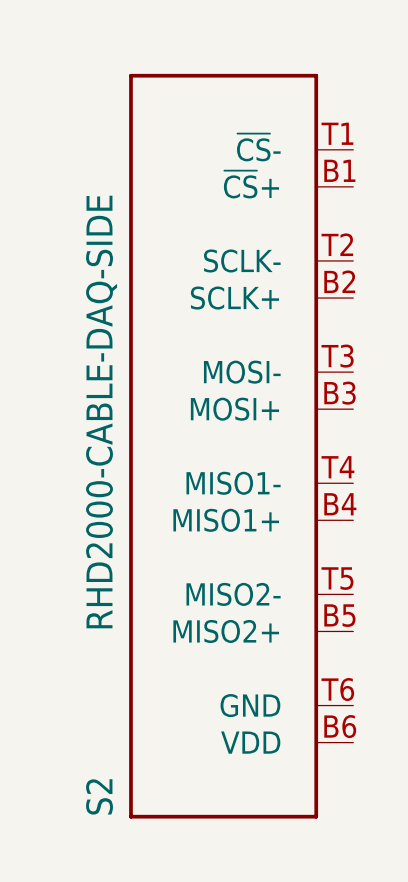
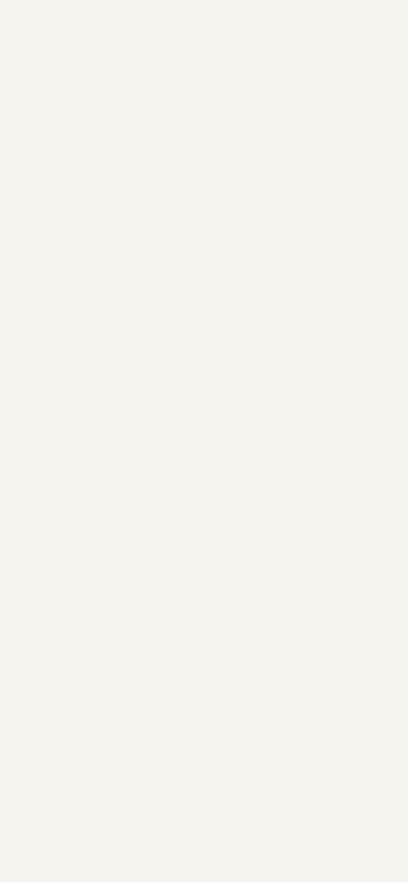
S2: RHD2000-CABLE-DAQ-SIDE (241, 446) -> none

